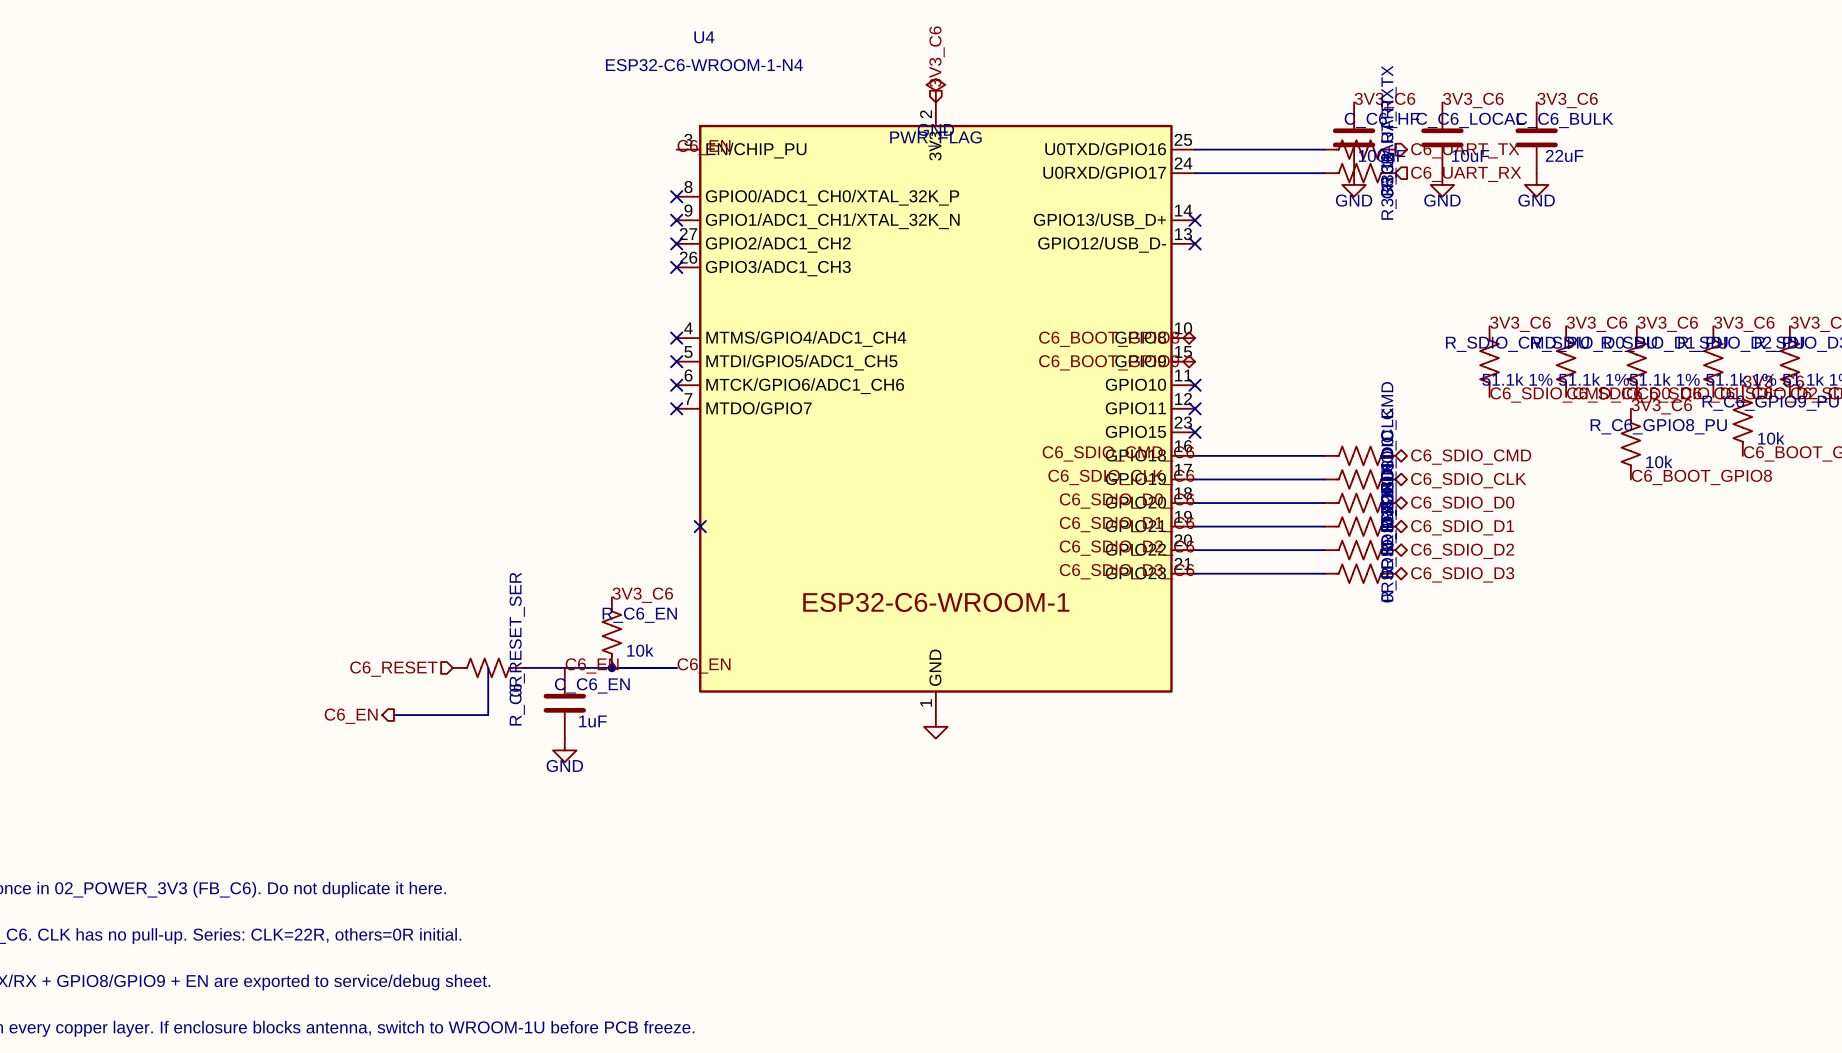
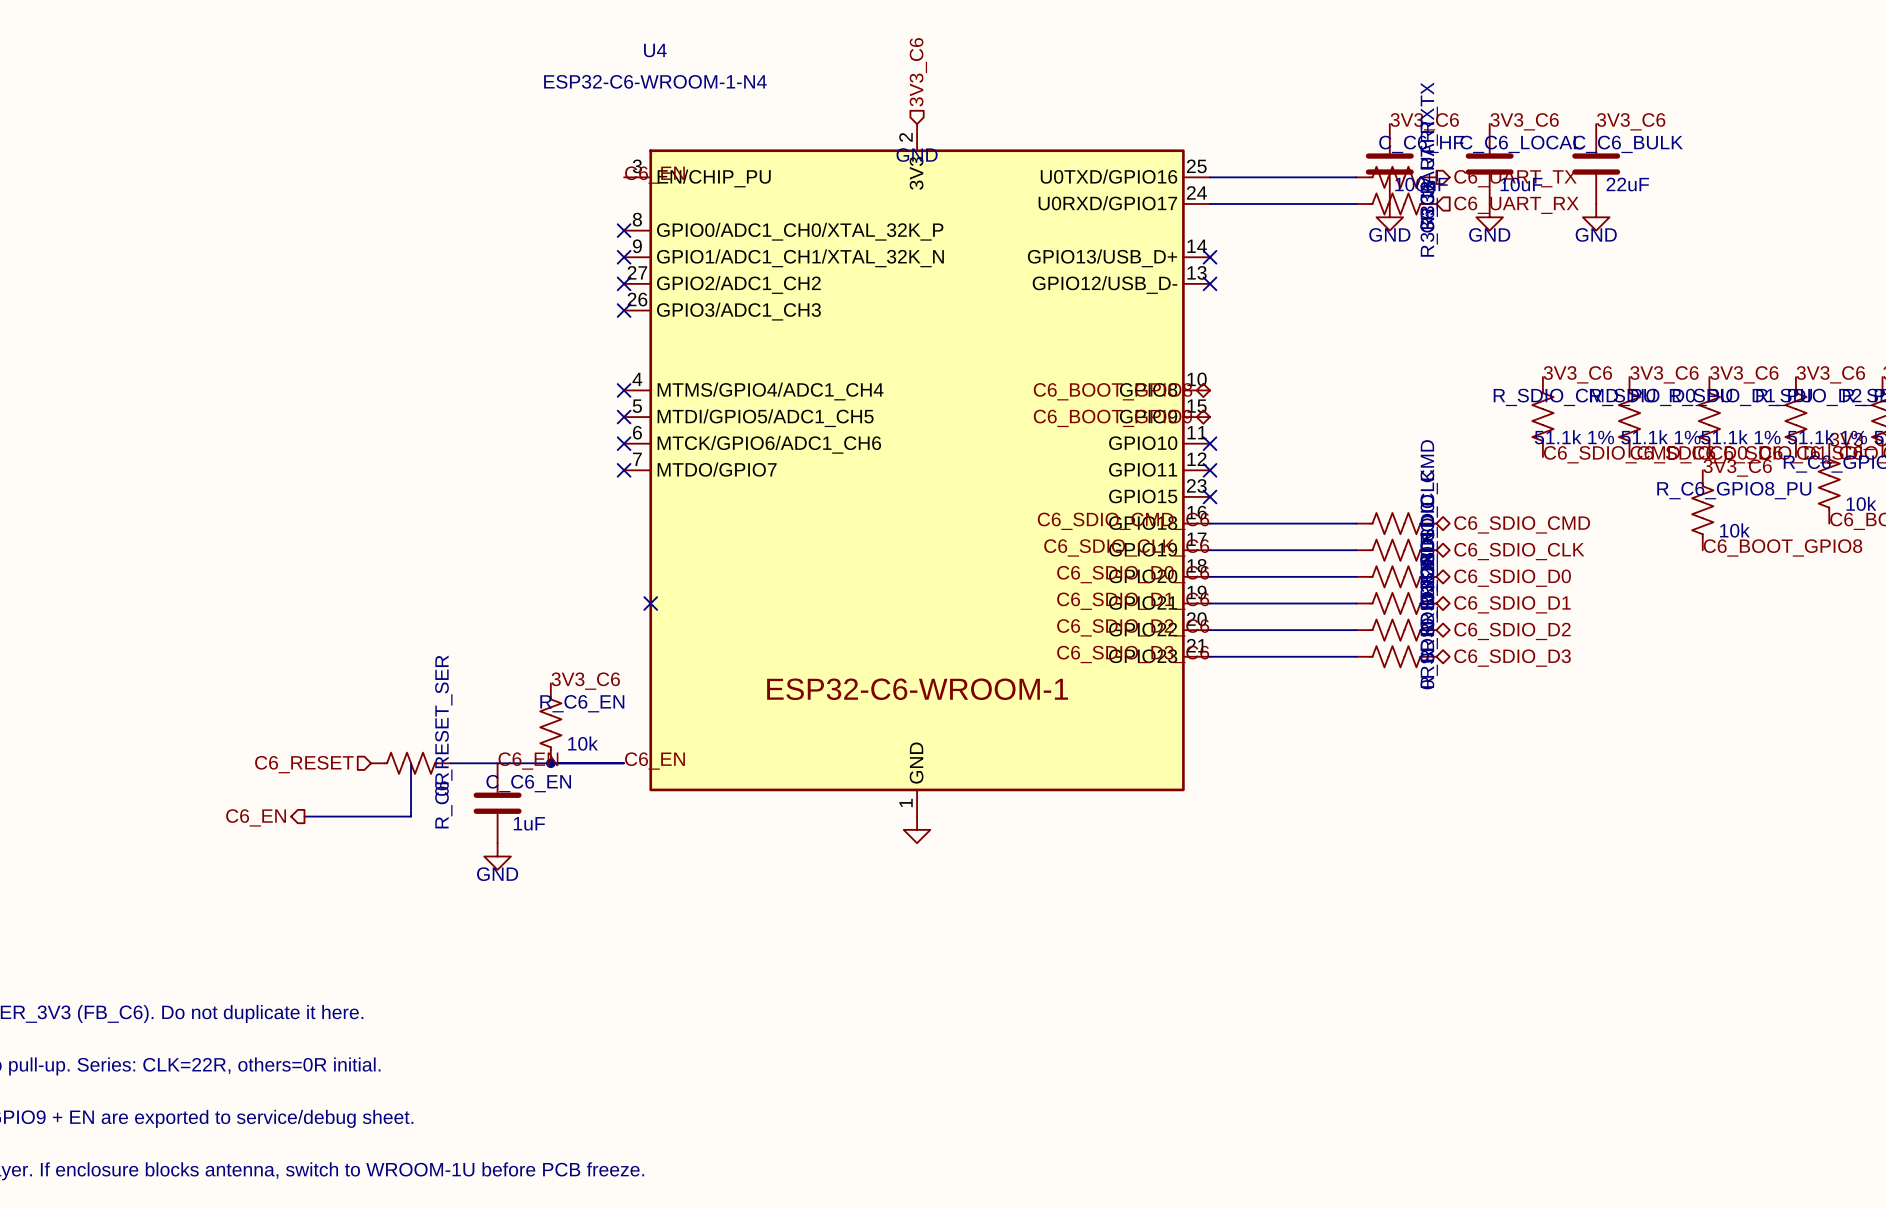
power symbol: PWR_FLAG (935, 90) -> none

